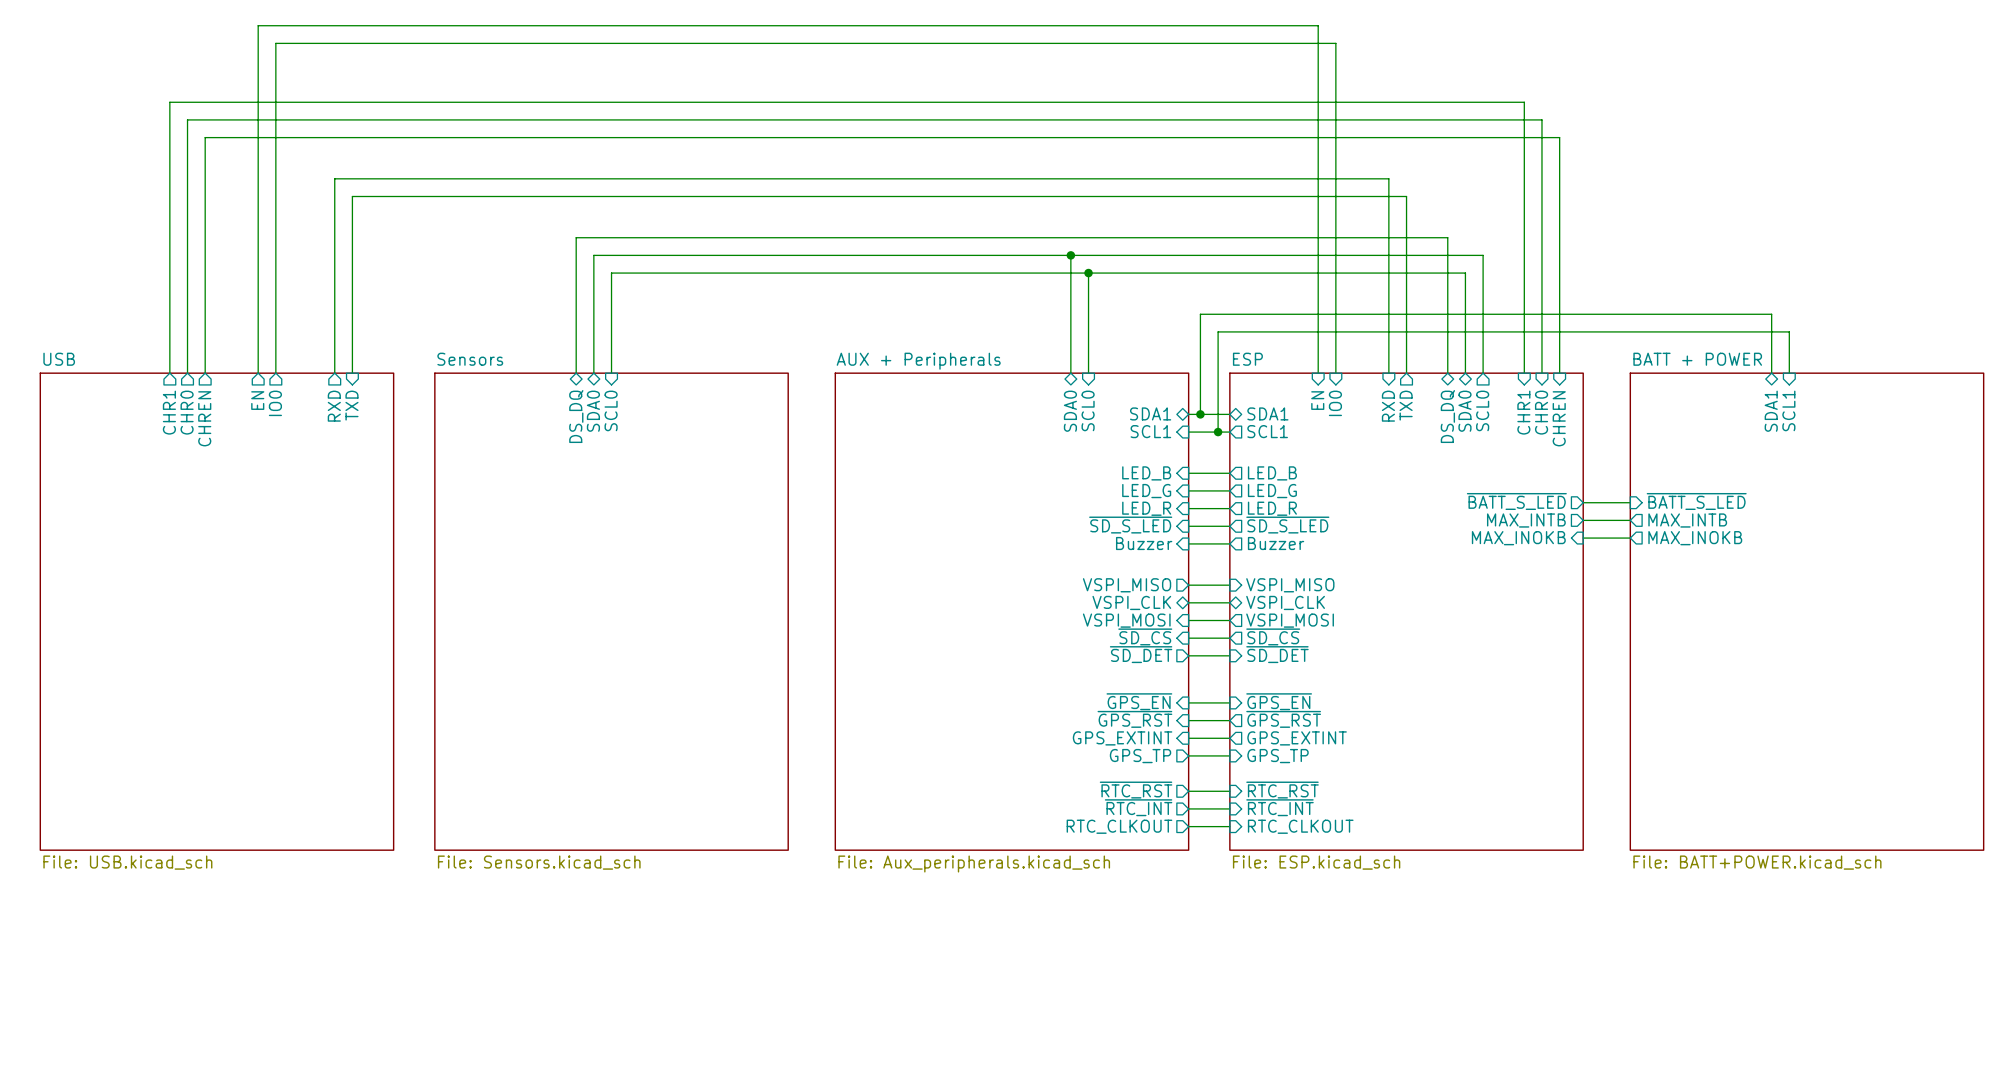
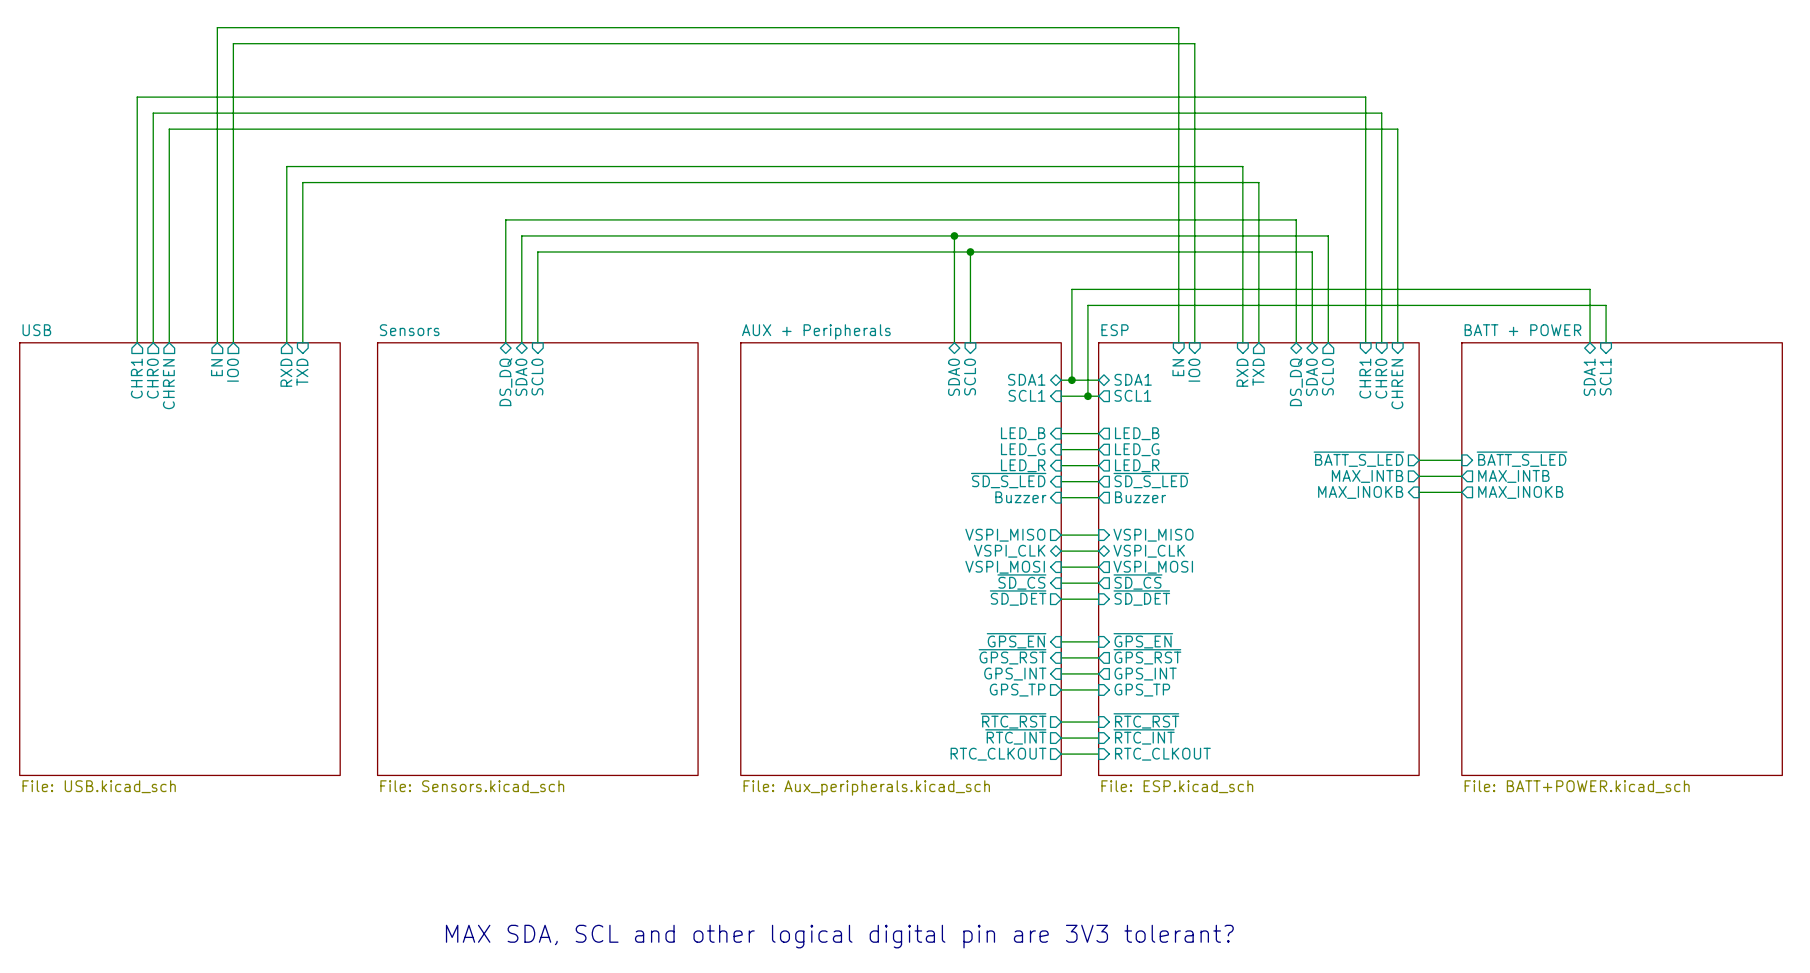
sheet pin: GPS_EXTINT (1122, 738) -> GPS_INT (1015, 674)
sheet pin: GPS_EXTINT (1297, 738) -> GPS_INT (1145, 674)
text: none -> MAX SDA, SCL and other logical digital pin are 3V3 tolerant? (839, 936)

